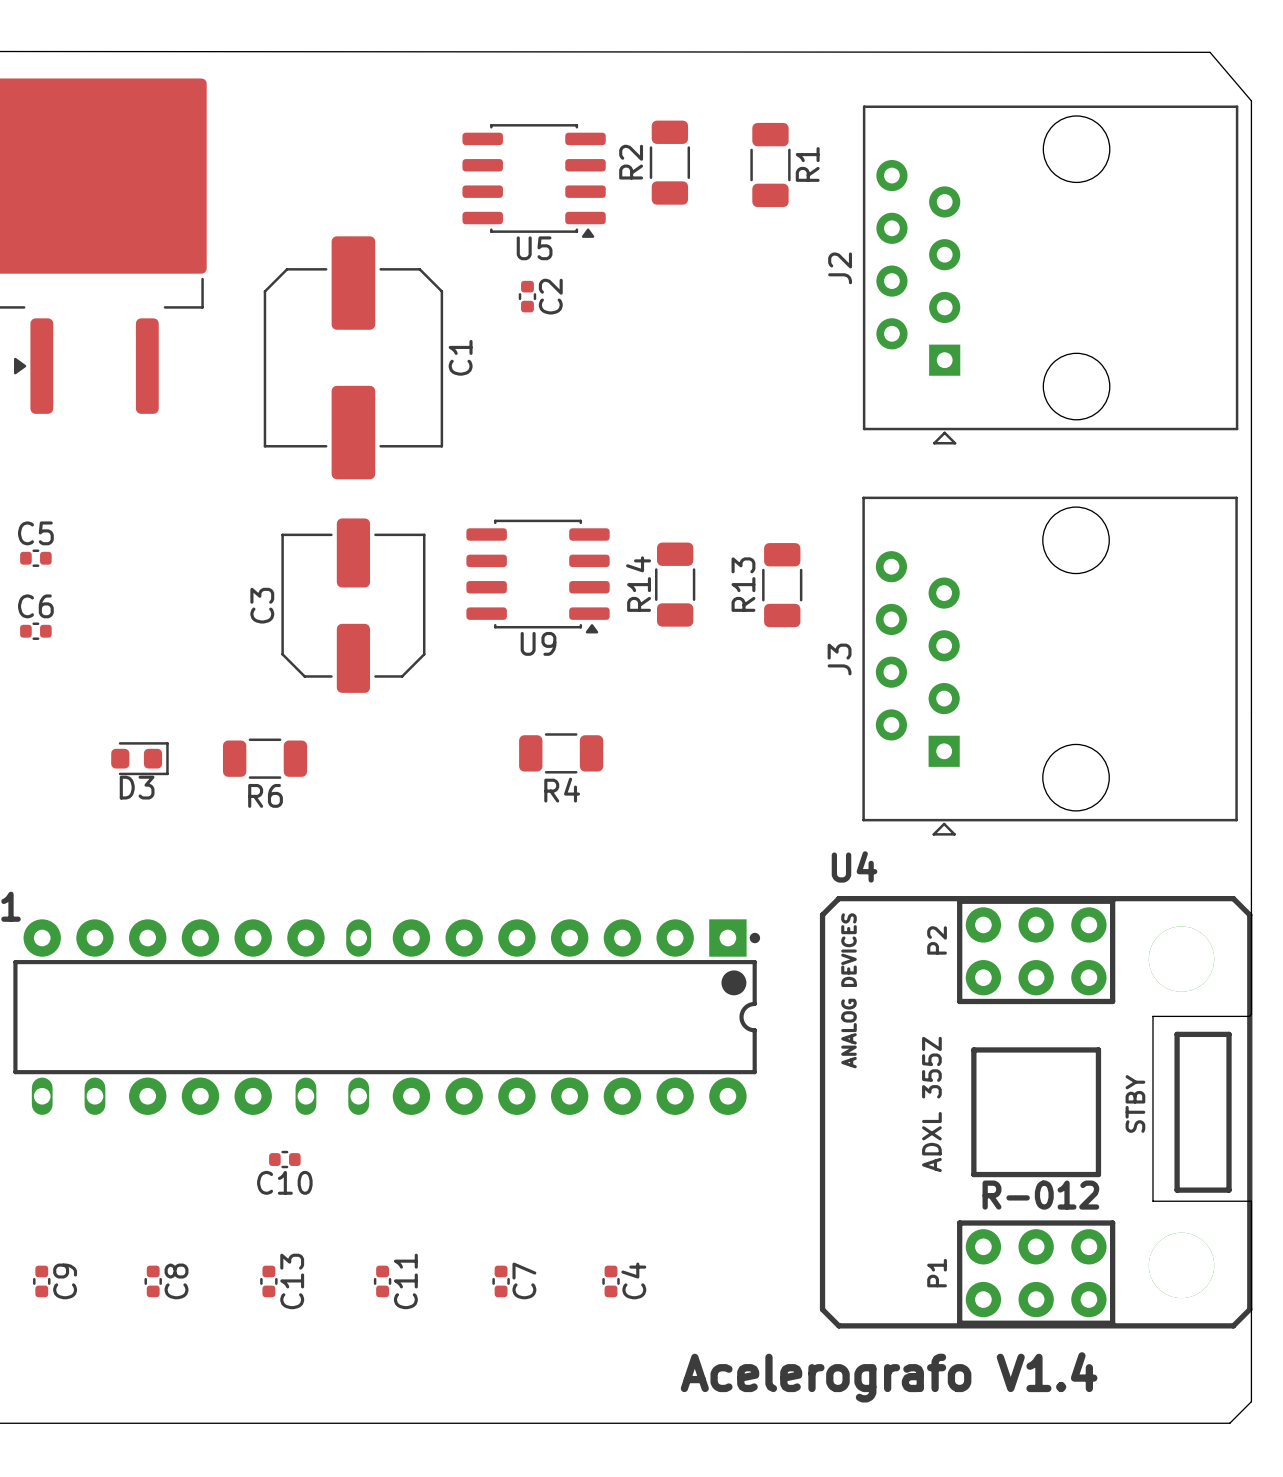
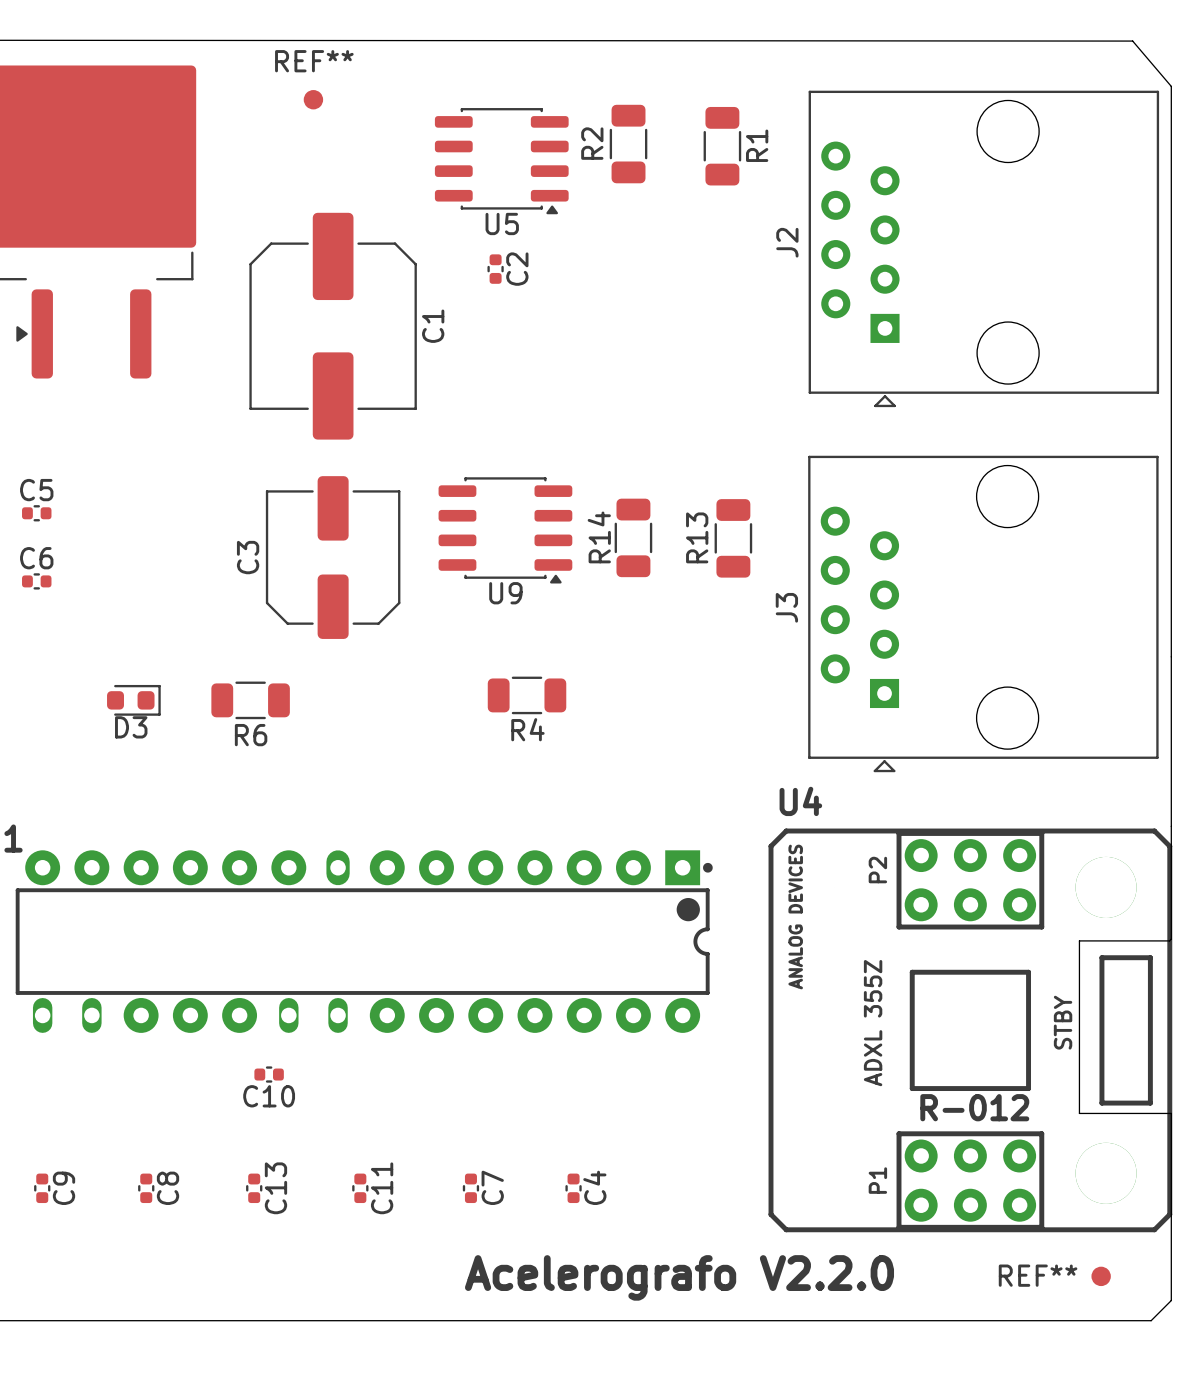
REF**: none -> (313, 99)
REF**: none -> (1101, 1276)
text: Acelerografo V1.4 (889, 1377) -> Acelerografo V2.2.0 (679, 1277)

